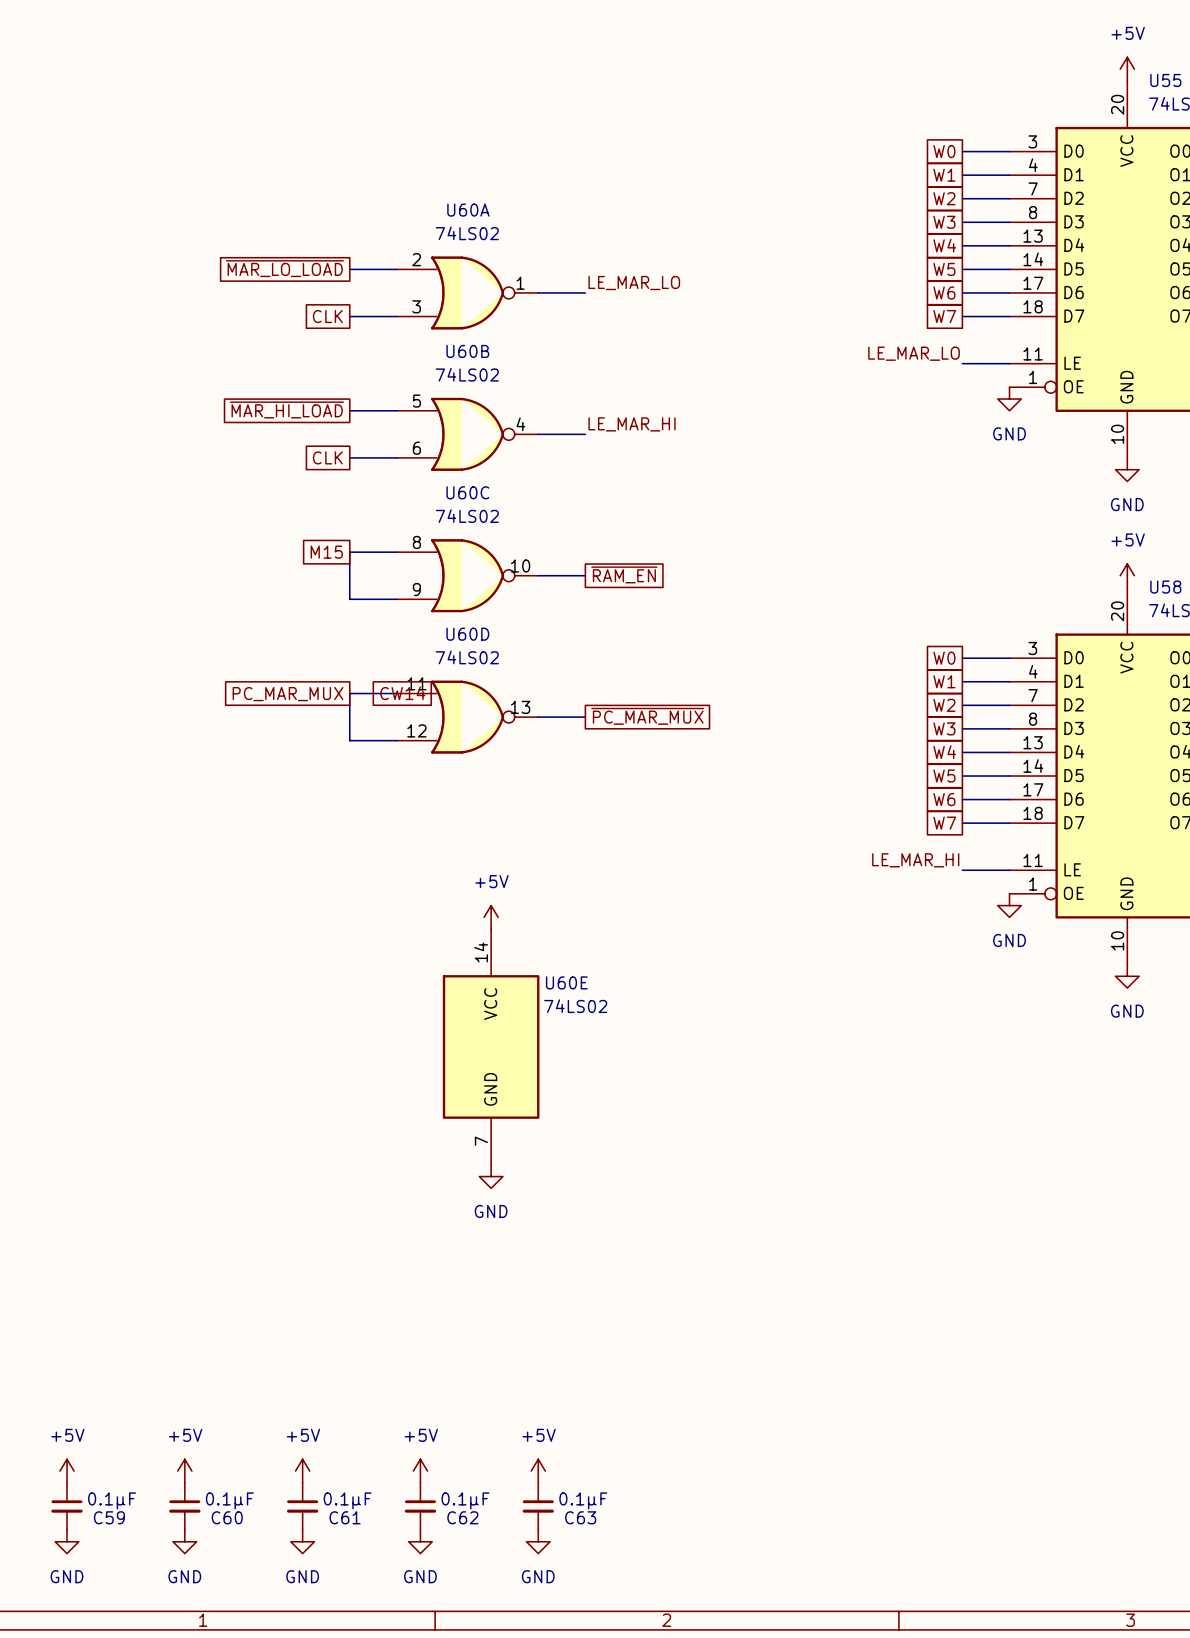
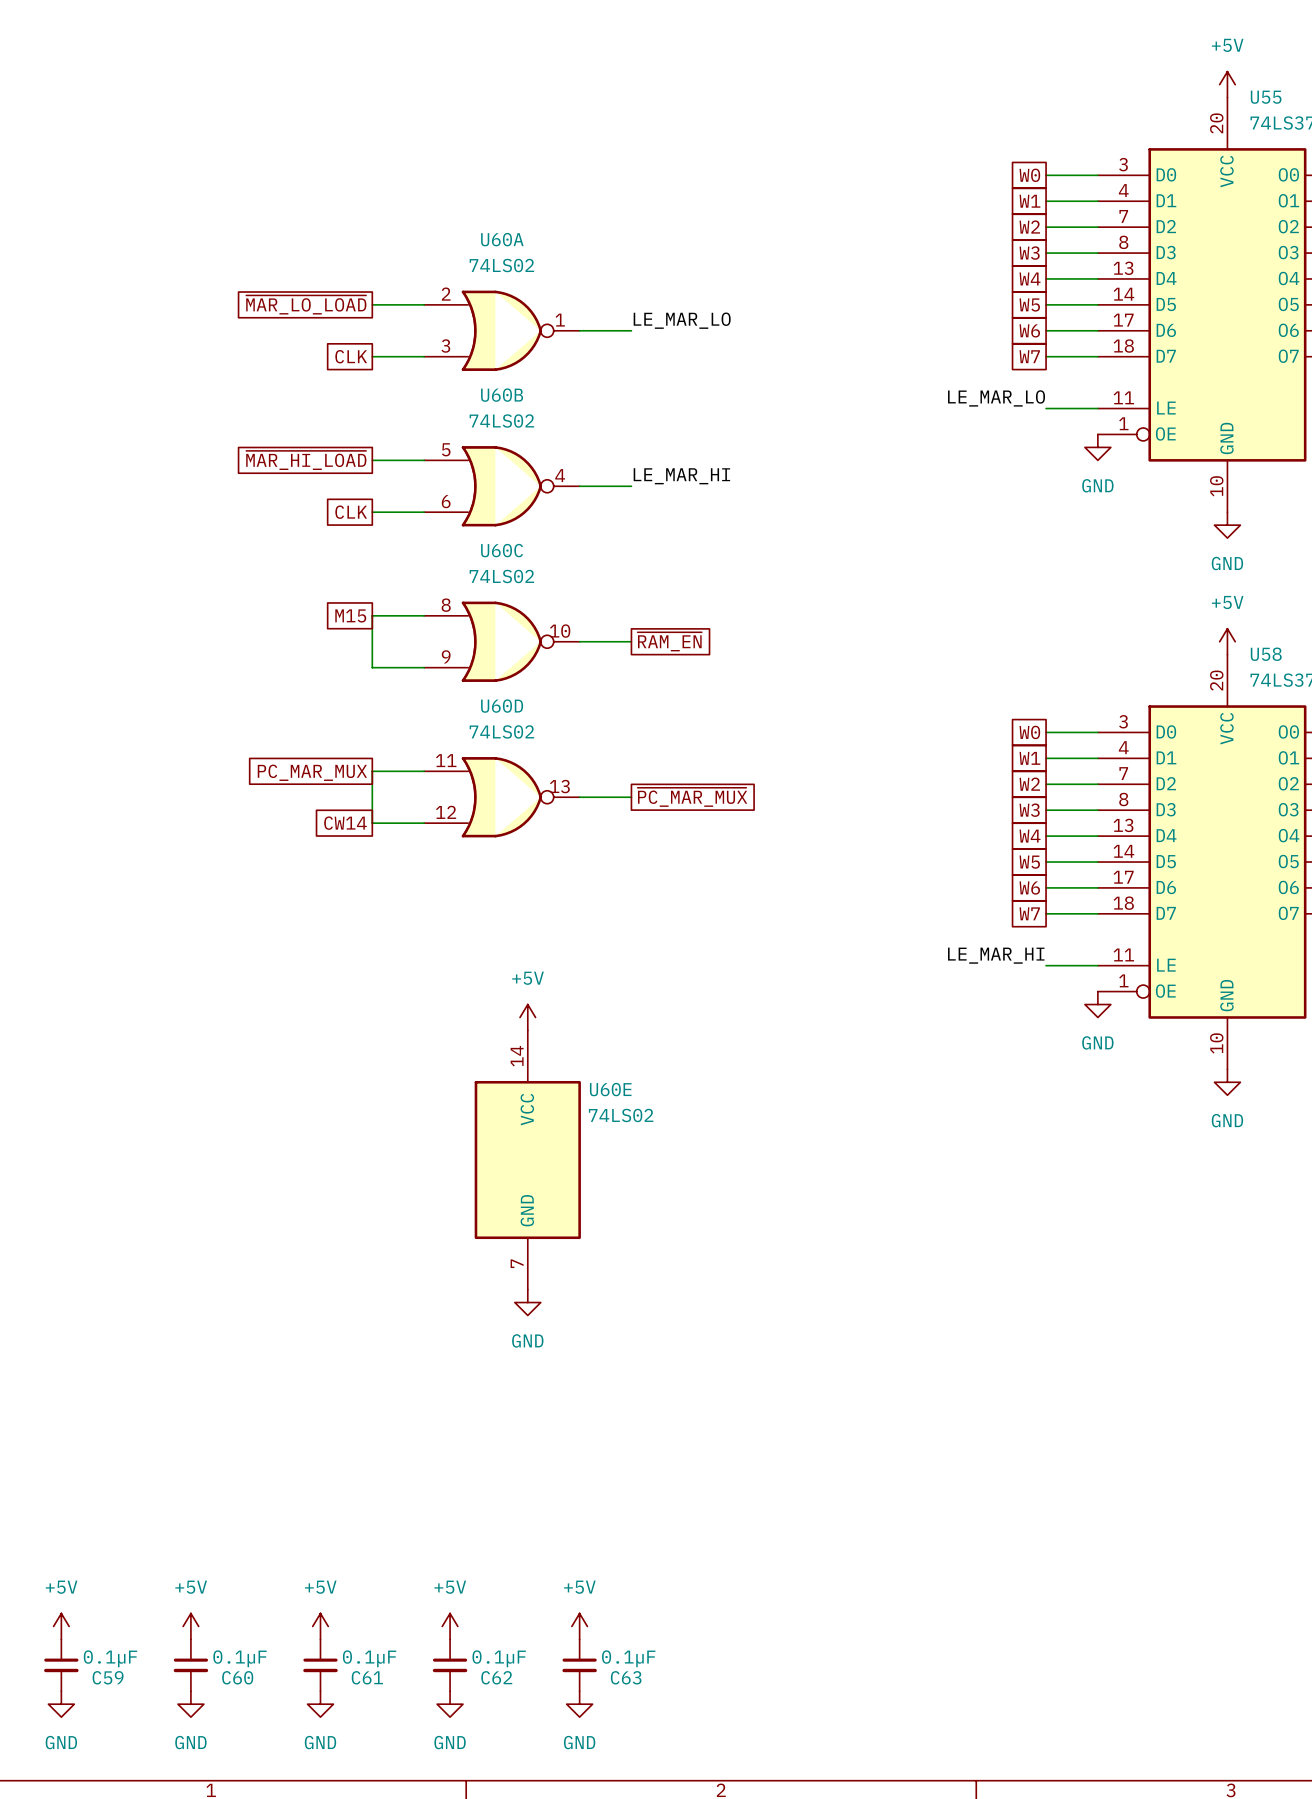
global label rotation: 0° (402, 693) -> 180° (345, 823)
global label position: CW14 (402, 693) -> CW14 (345, 823)

